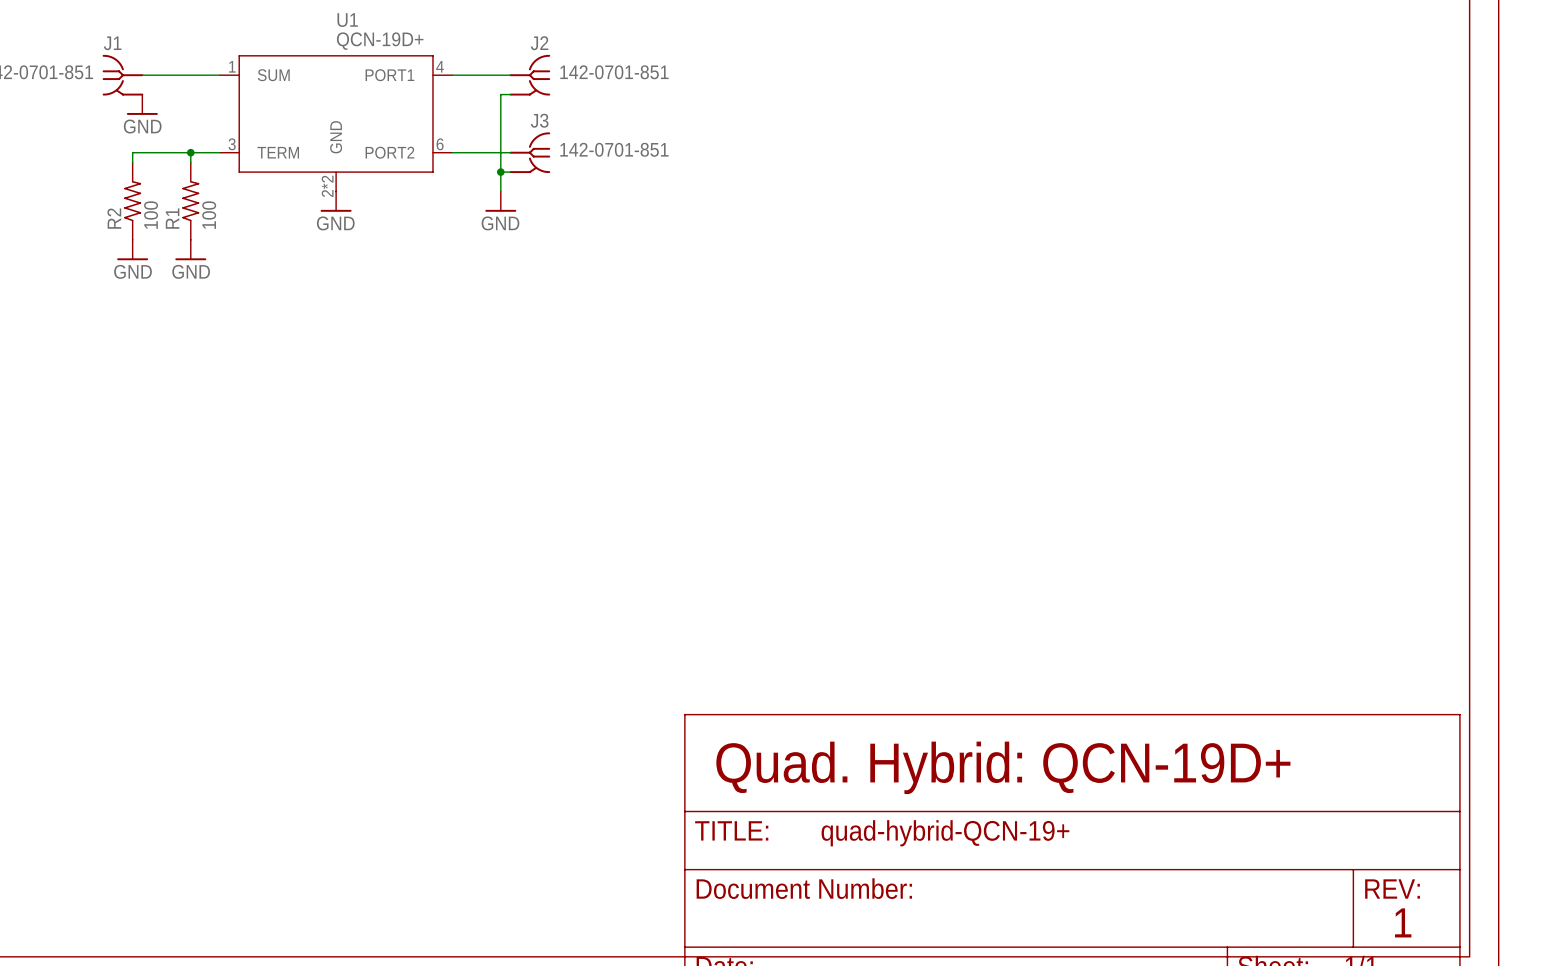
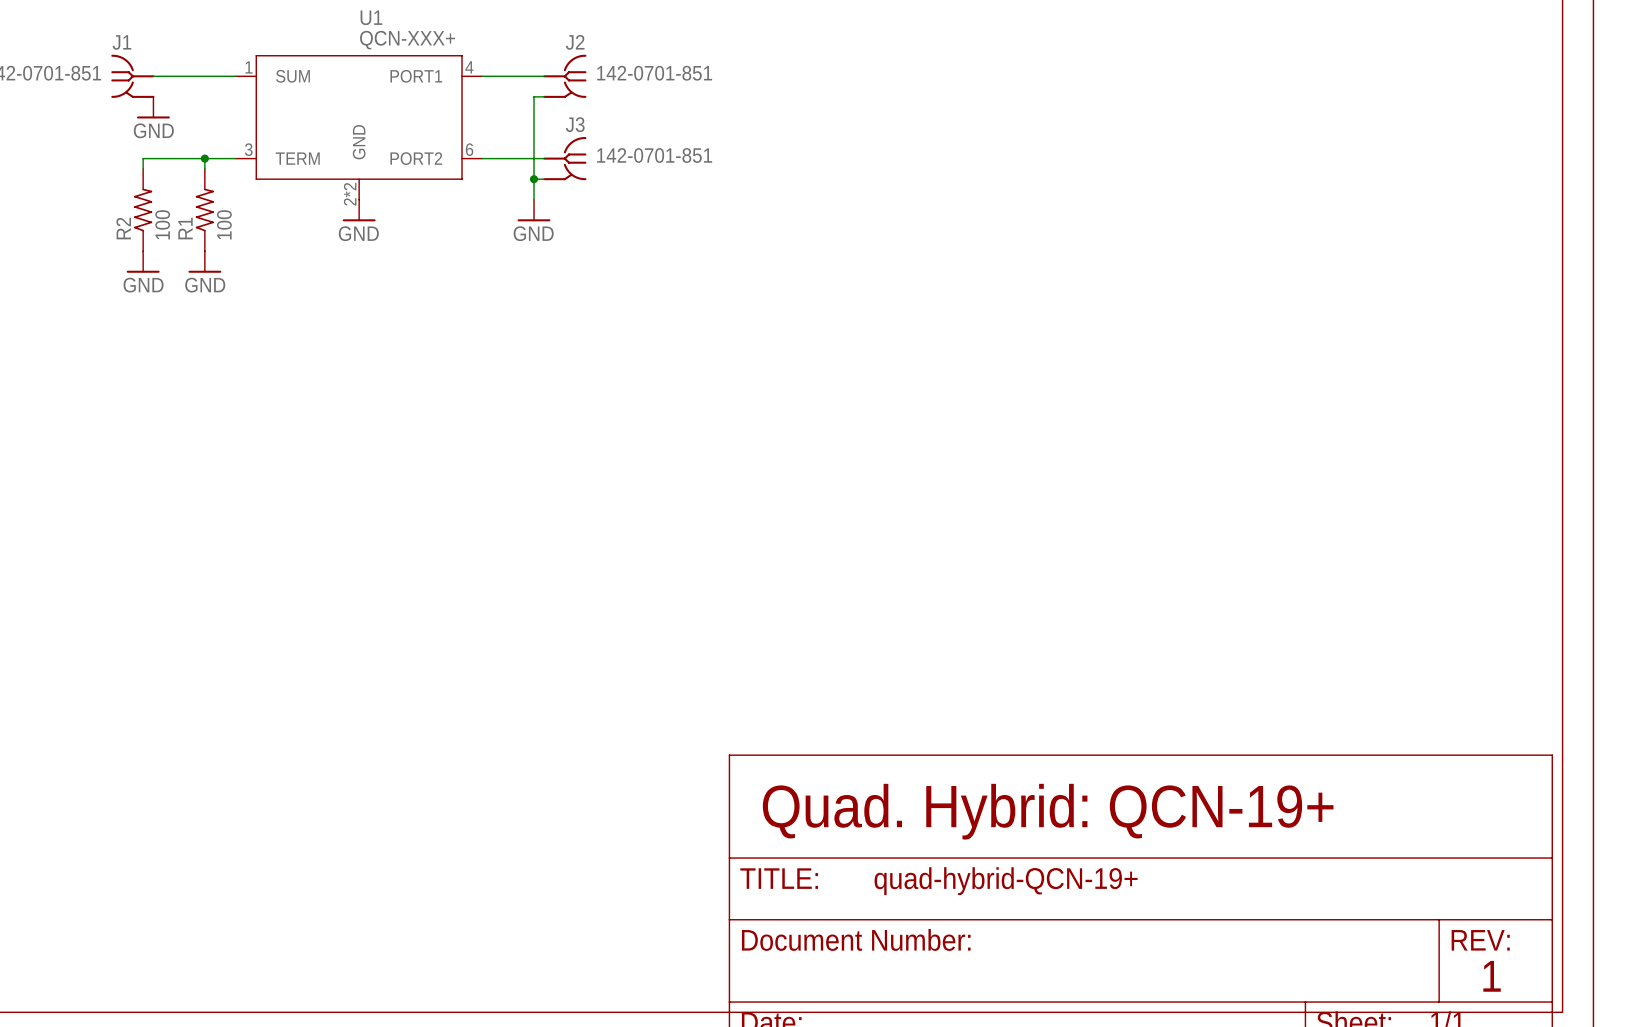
U1 value: QCN-19D+ (380, 41) -> QCN-XXX+ (407, 40)
text: Quad. Hybrid: QCN-19D+ (1003, 767) -> Quad. Hybrid: QCN-19+ (1048, 811)

